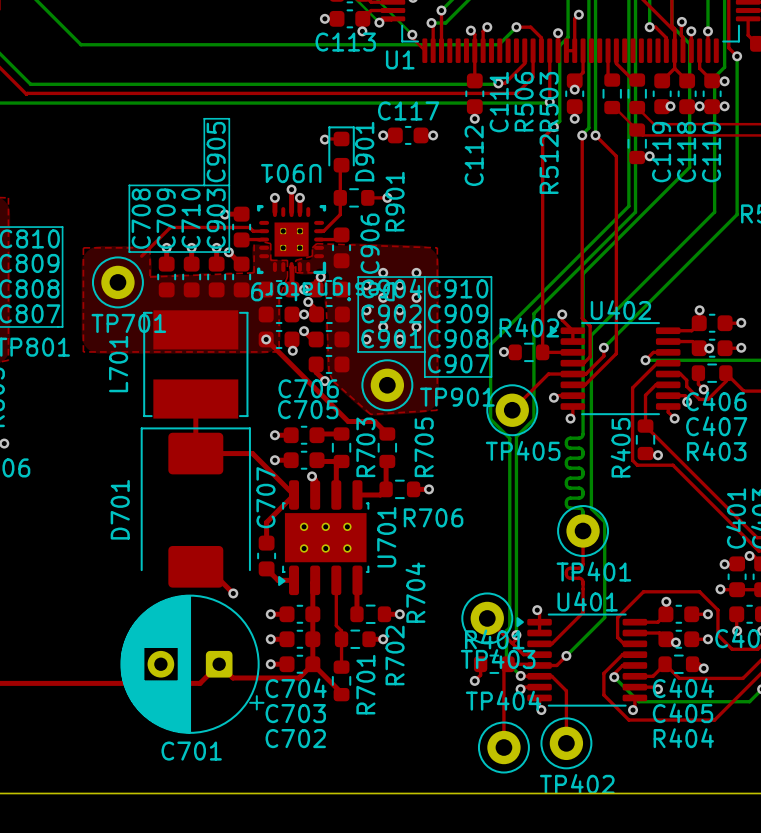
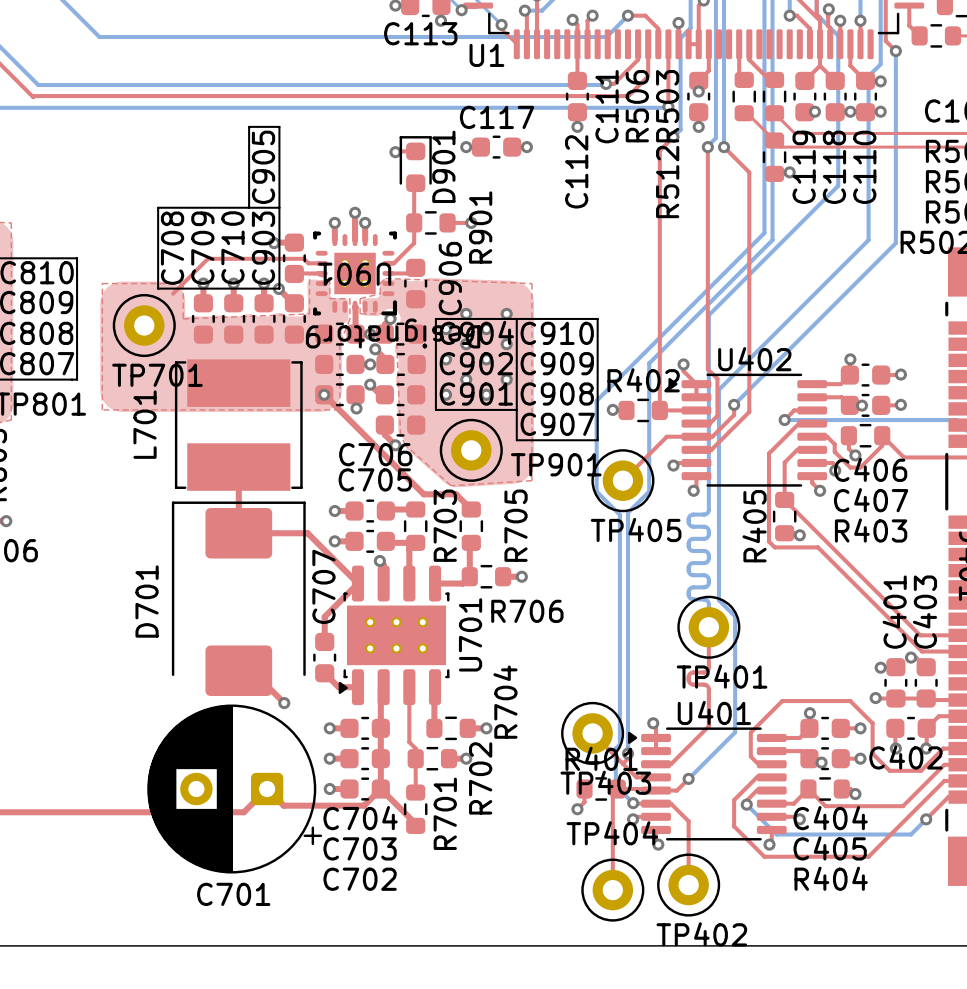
U901 name position: U901 (291, 173) -> U901 (354, 274)

